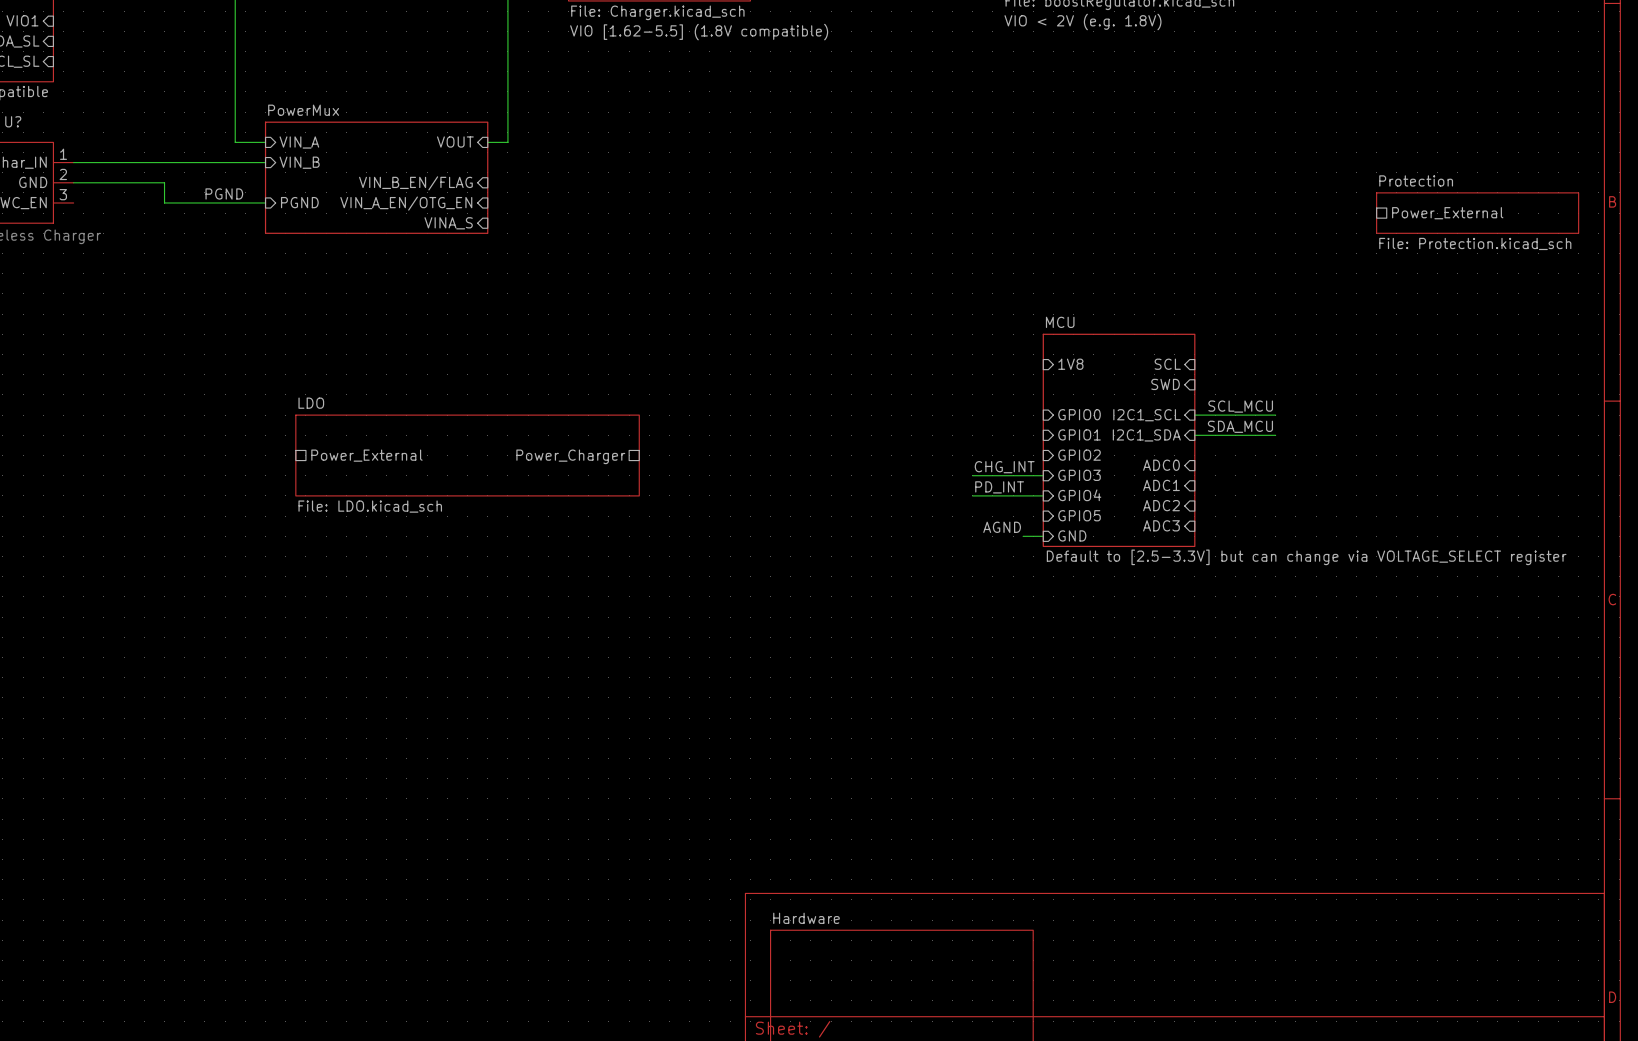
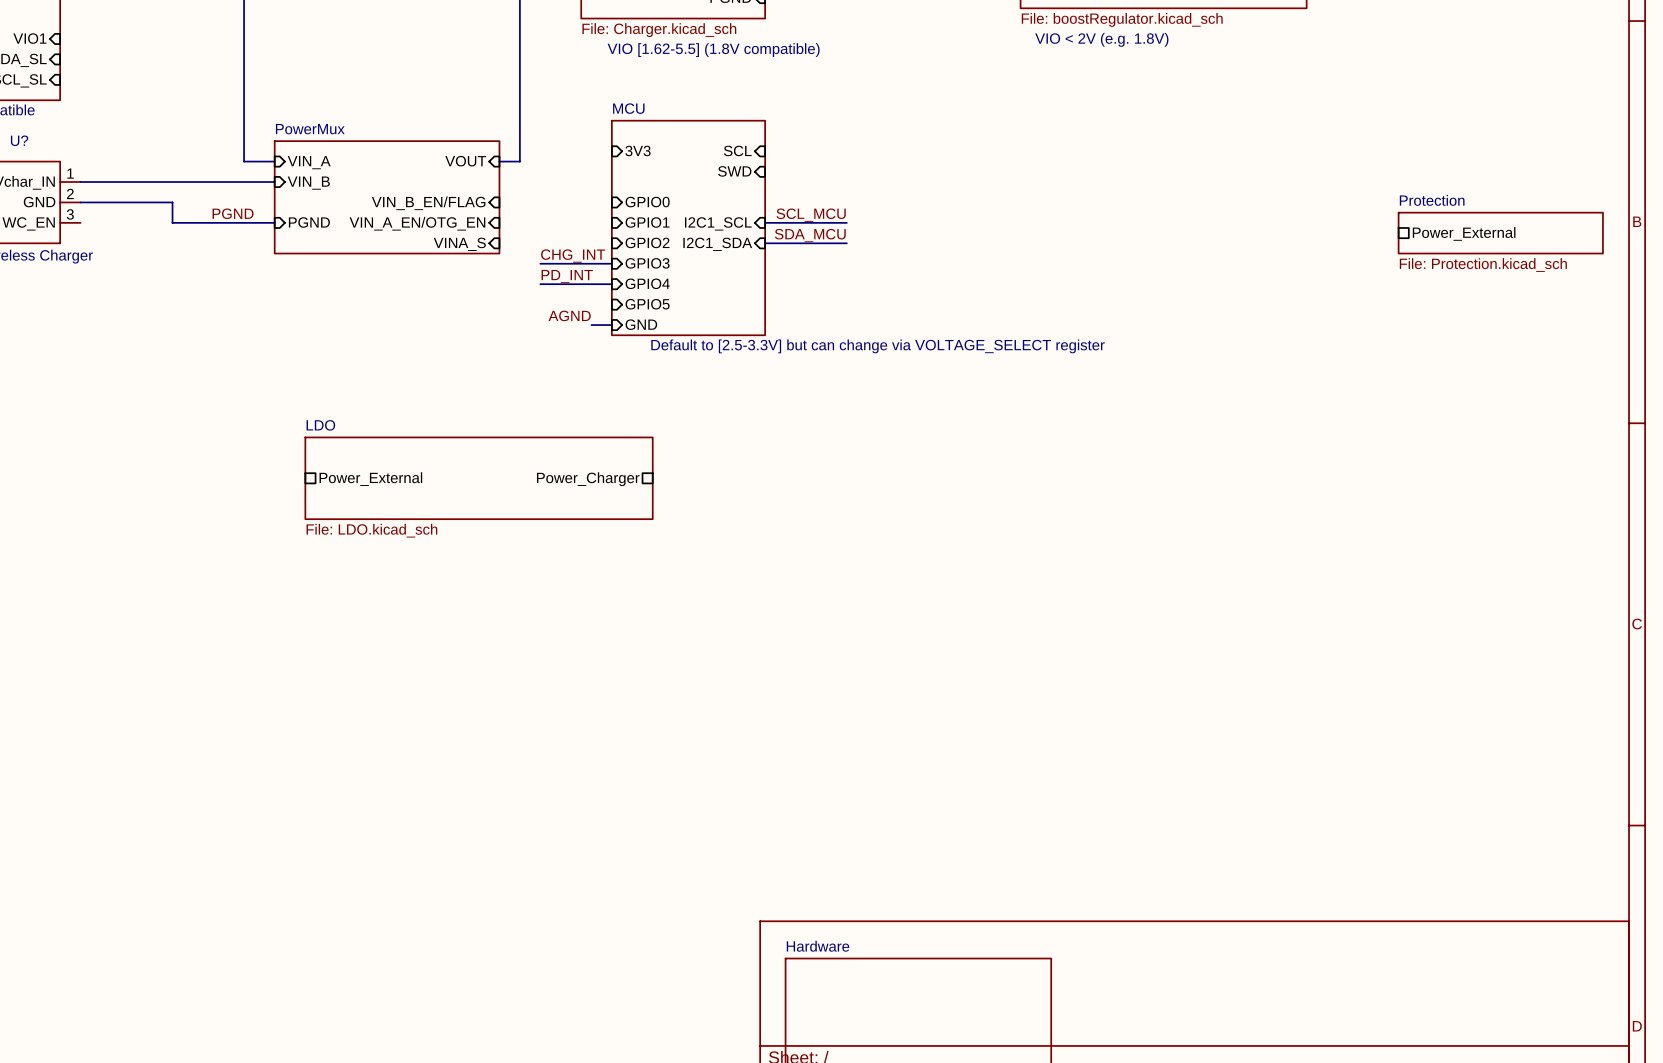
sheet pin: none -> 3V3 (638, 150)
sheet pin: none -> SCL (737, 150)
sheet pin: none -> SWD (734, 171)
sheet pin: none -> GPIO0 (647, 202)
label: none -> SCL_MCU (811, 215)
sheet pin: none -> GPIO1 (647, 222)
wire: none -> (765, 222) (846, 222)
sheet pin: none -> I2C1_SCL (718, 223)
sheet MCU: none -> (688, 227)
label: none -> SDA_MCU (810, 235)
sheet pin: none -> GPIO2 (647, 242)
sheet pin: none -> I2C1_SDA (717, 244)
wire: none -> (765, 243) (846, 243)
label: none -> CHG_INT (573, 256)
wire: none -> (540, 263) (611, 263)
sheet pin: none -> GPIO3 (647, 263)
label: none -> PD_INT (567, 276)
sheet pin: none -> GPIO4 (647, 283)
wire: none -> (540, 284) (611, 284)
sheet pin: none -> GPIO5 (647, 304)
label: none -> AGND (569, 315)
sheet pin: none -> GND (641, 324)
wire: none -> (591, 325) (611, 325)
sheet pin: 1V8 (1070, 364) -> none
sheet pin: SCL (1167, 364) -> none
sheet pin: SWD (1165, 384) -> none
label: SCL_MCU (1240, 406) -> none
sheet pin: GPIO0 (1079, 414) -> none
sheet pin: I2C1_SCL (1147, 415) -> none
wire: (1194, 415) (1275, 415) -> none
label: SDA_MCU (1240, 426) -> none
sheet pin: GPIO1 (1079, 434) -> none
sheet pin: I2C1_SDA (1146, 435) -> none
wire: (1194, 435) (1275, 435) -> none
sheet MCU: (1119, 440) -> none
sheet pin: GPIO2 (1079, 455) -> none
sheet pin: ADC0 (1161, 465) -> none
label: CHG_INT (1004, 467) -> none
wire: (972, 475) (1043, 475) -> none
sheet pin: GPIO3 (1079, 475) -> none
sheet pin: ADC1 (1161, 485) -> none
label: PD_INT (999, 487) -> none
wire: (972, 495) (1043, 495) -> none
sheet pin: GPIO4 (1079, 495) -> none
sheet pin: ADC2 (1161, 505) -> none
sheet pin: GPIO5 (1079, 515) -> none
sheet pin: ADC3 (1161, 525) -> none
label: AGND (1002, 527) -> none
sheet pin: GND (1072, 535) -> none
wire: (1023, 536) (1043, 536) -> none

